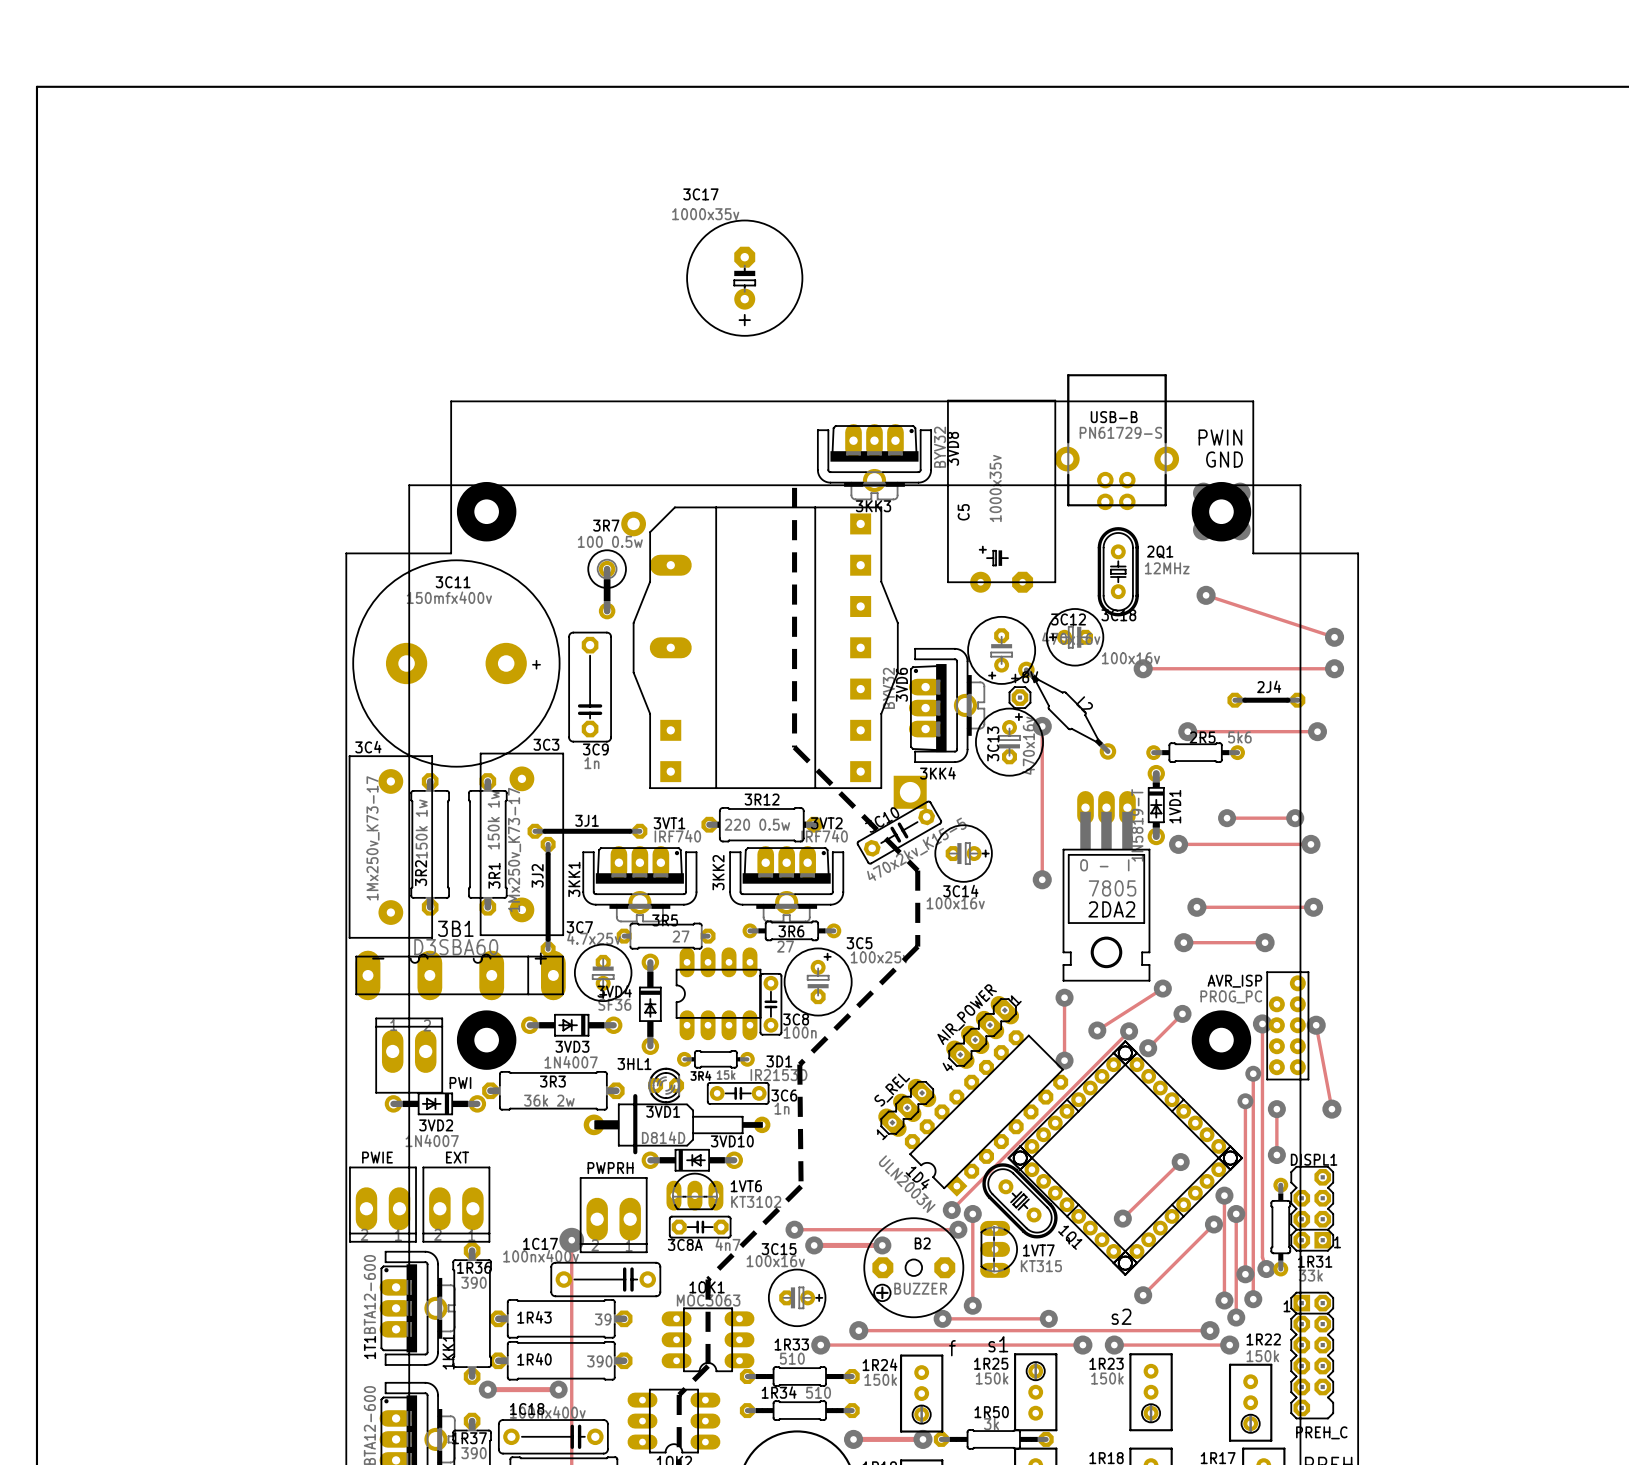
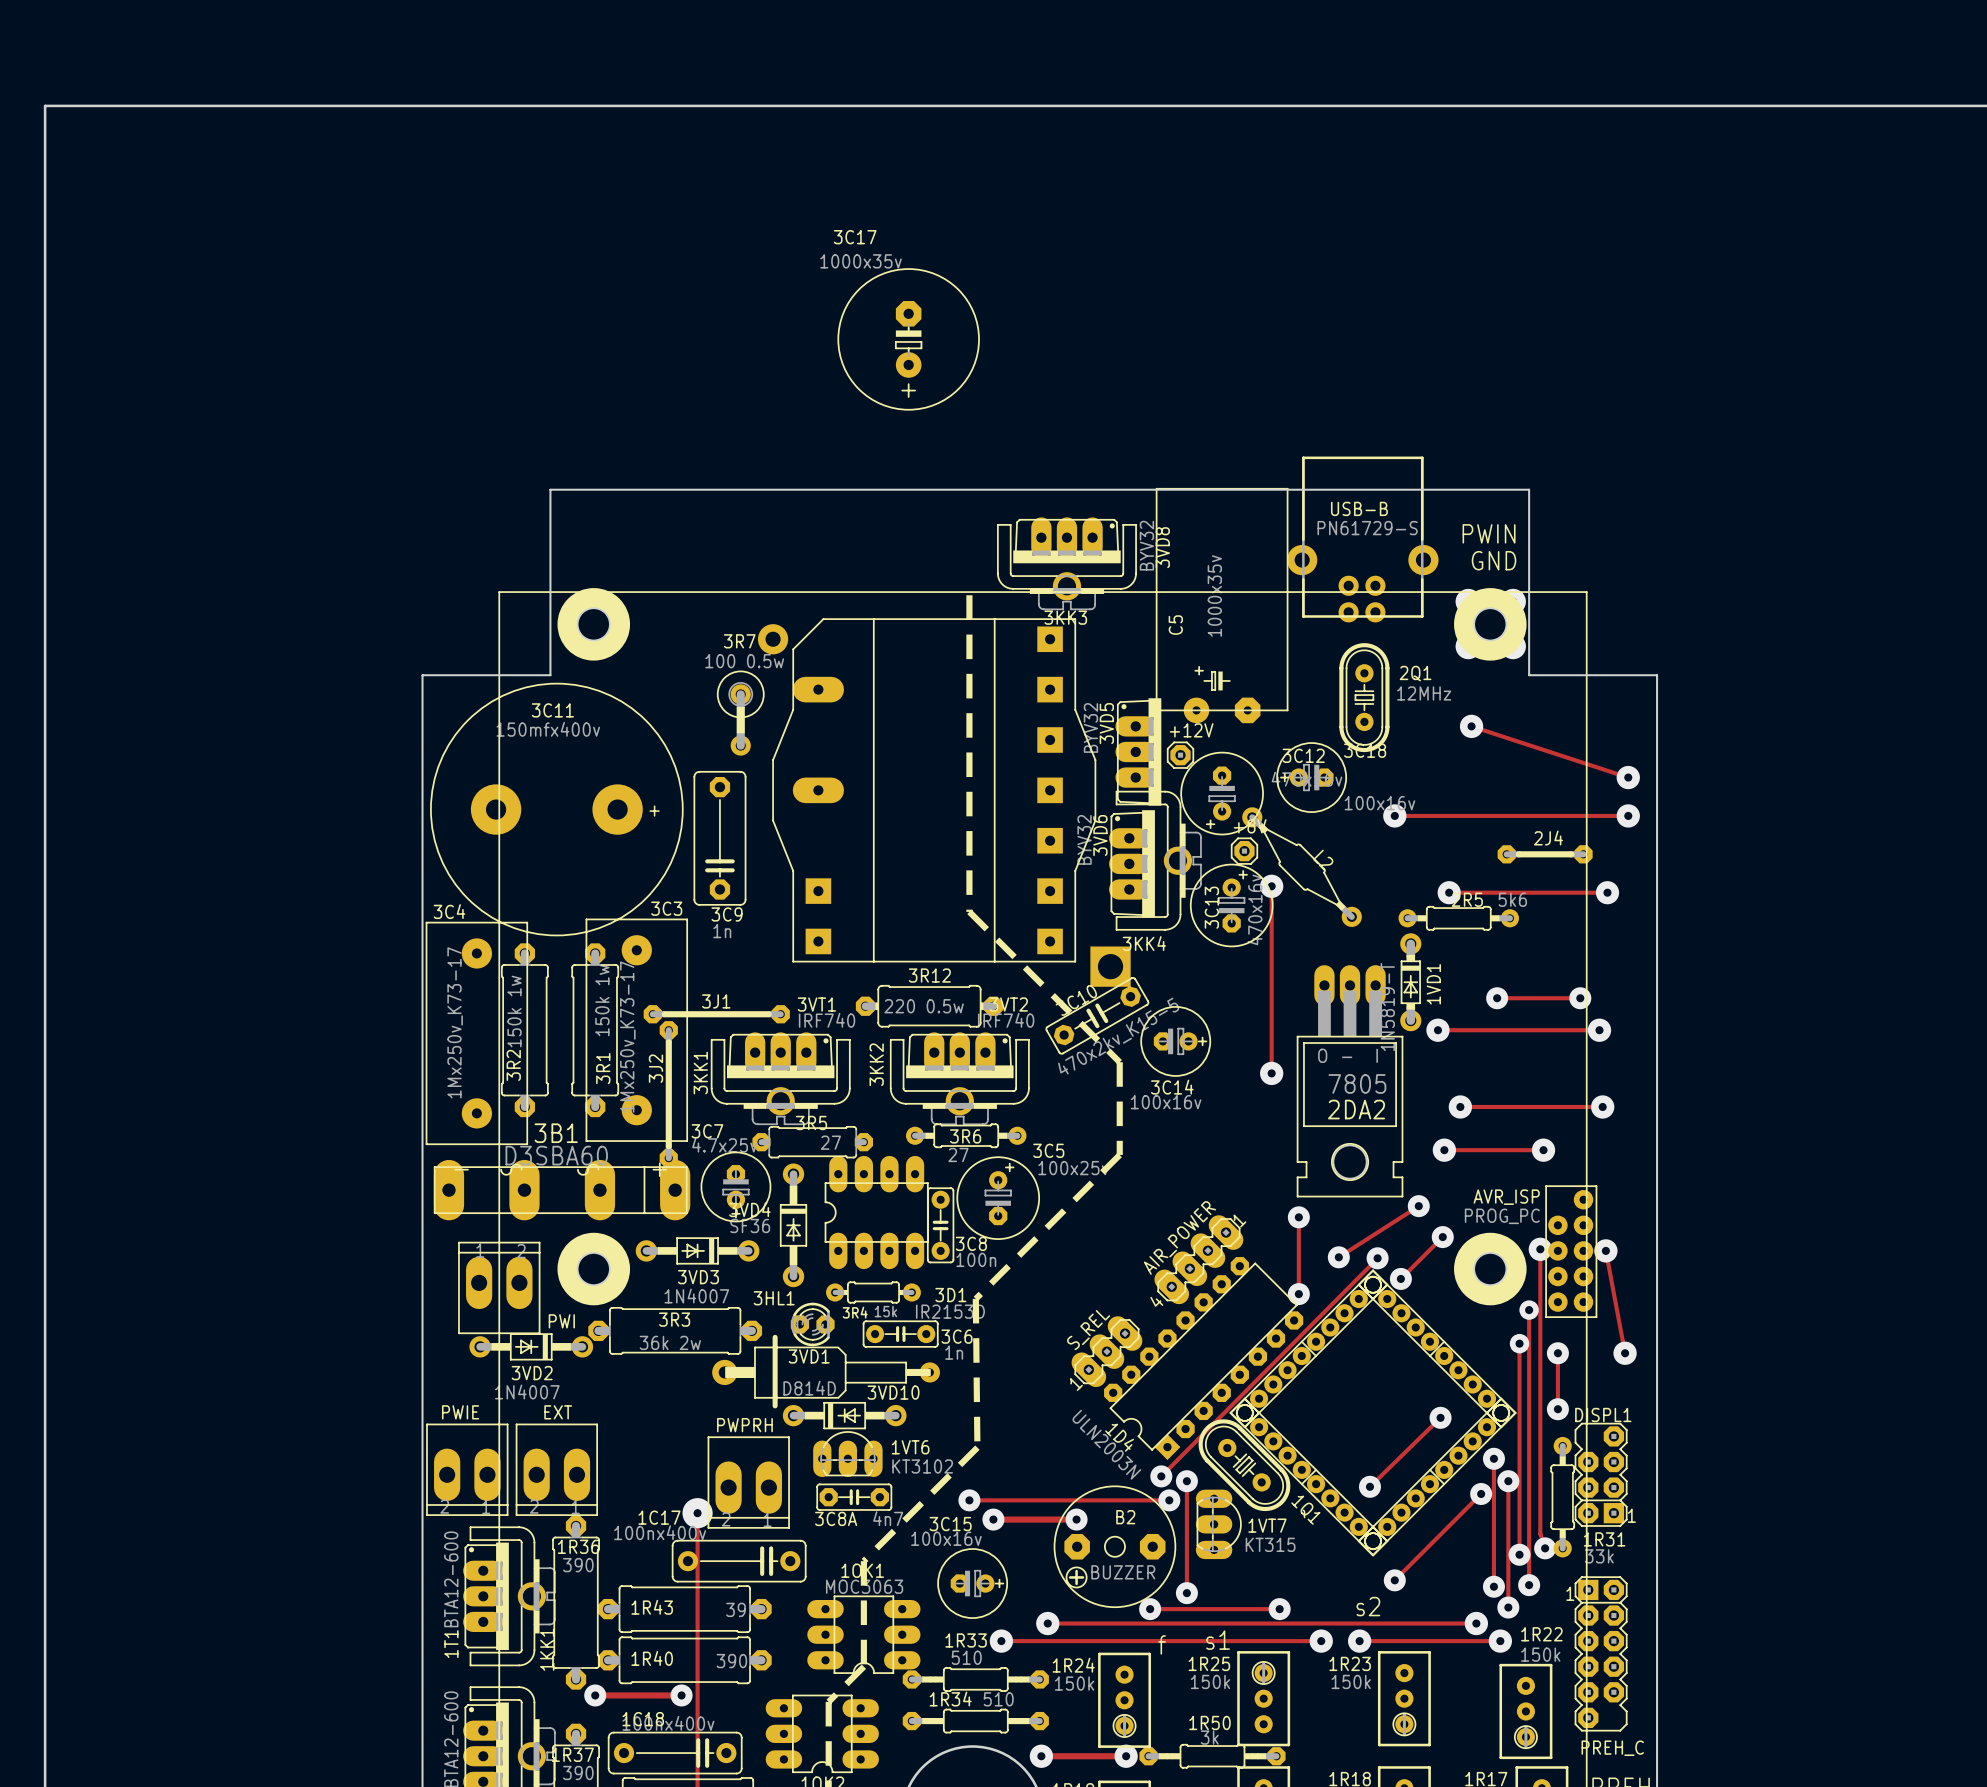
3VD5: none -> BYV32 (1138, 751)
+12V: none -> (1180, 755)

